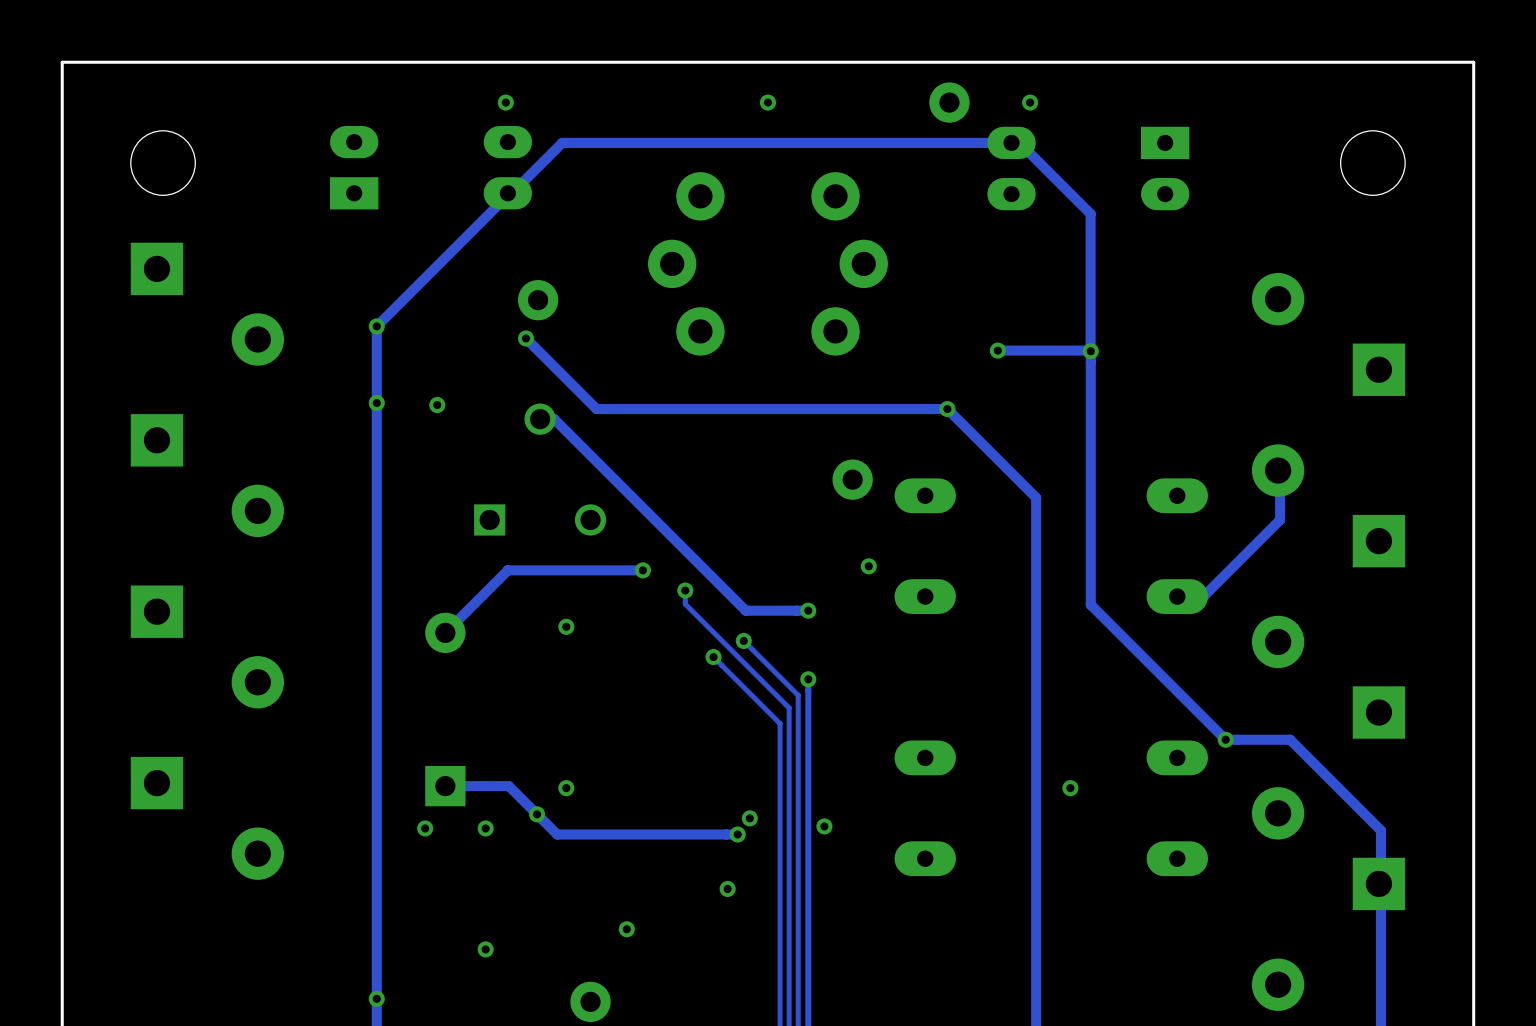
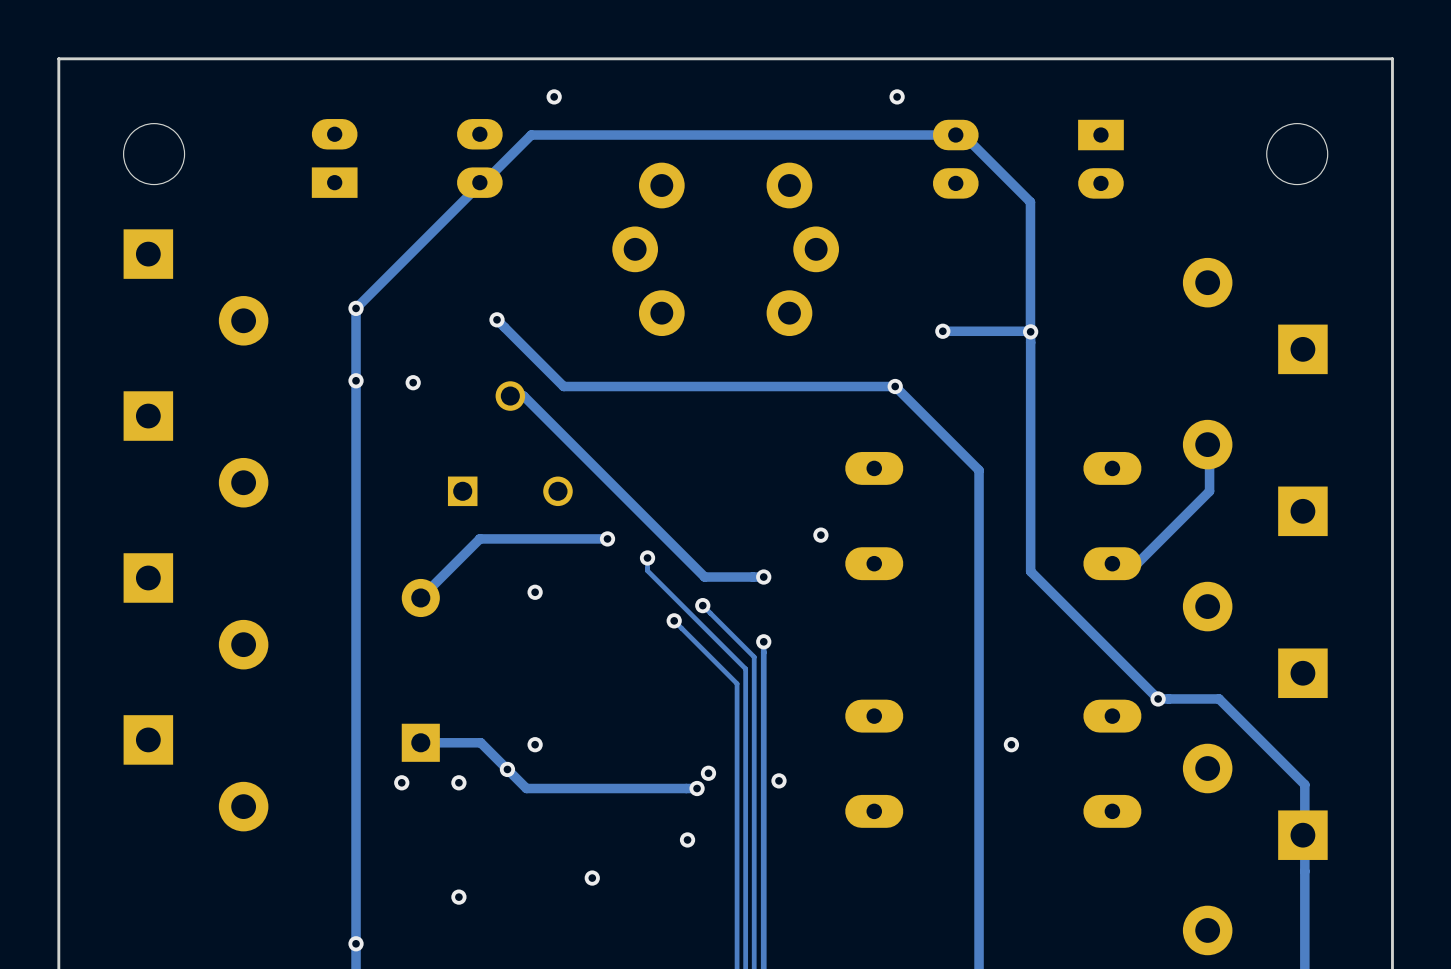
via position: (505, 102) -> (554, 96)
via: (767, 102) -> none
part: (949, 102) -> none
via position: (1030, 102) -> (897, 96)
part: (538, 300) -> none
part: (852, 479) -> none
part: (590, 1001) -> none

